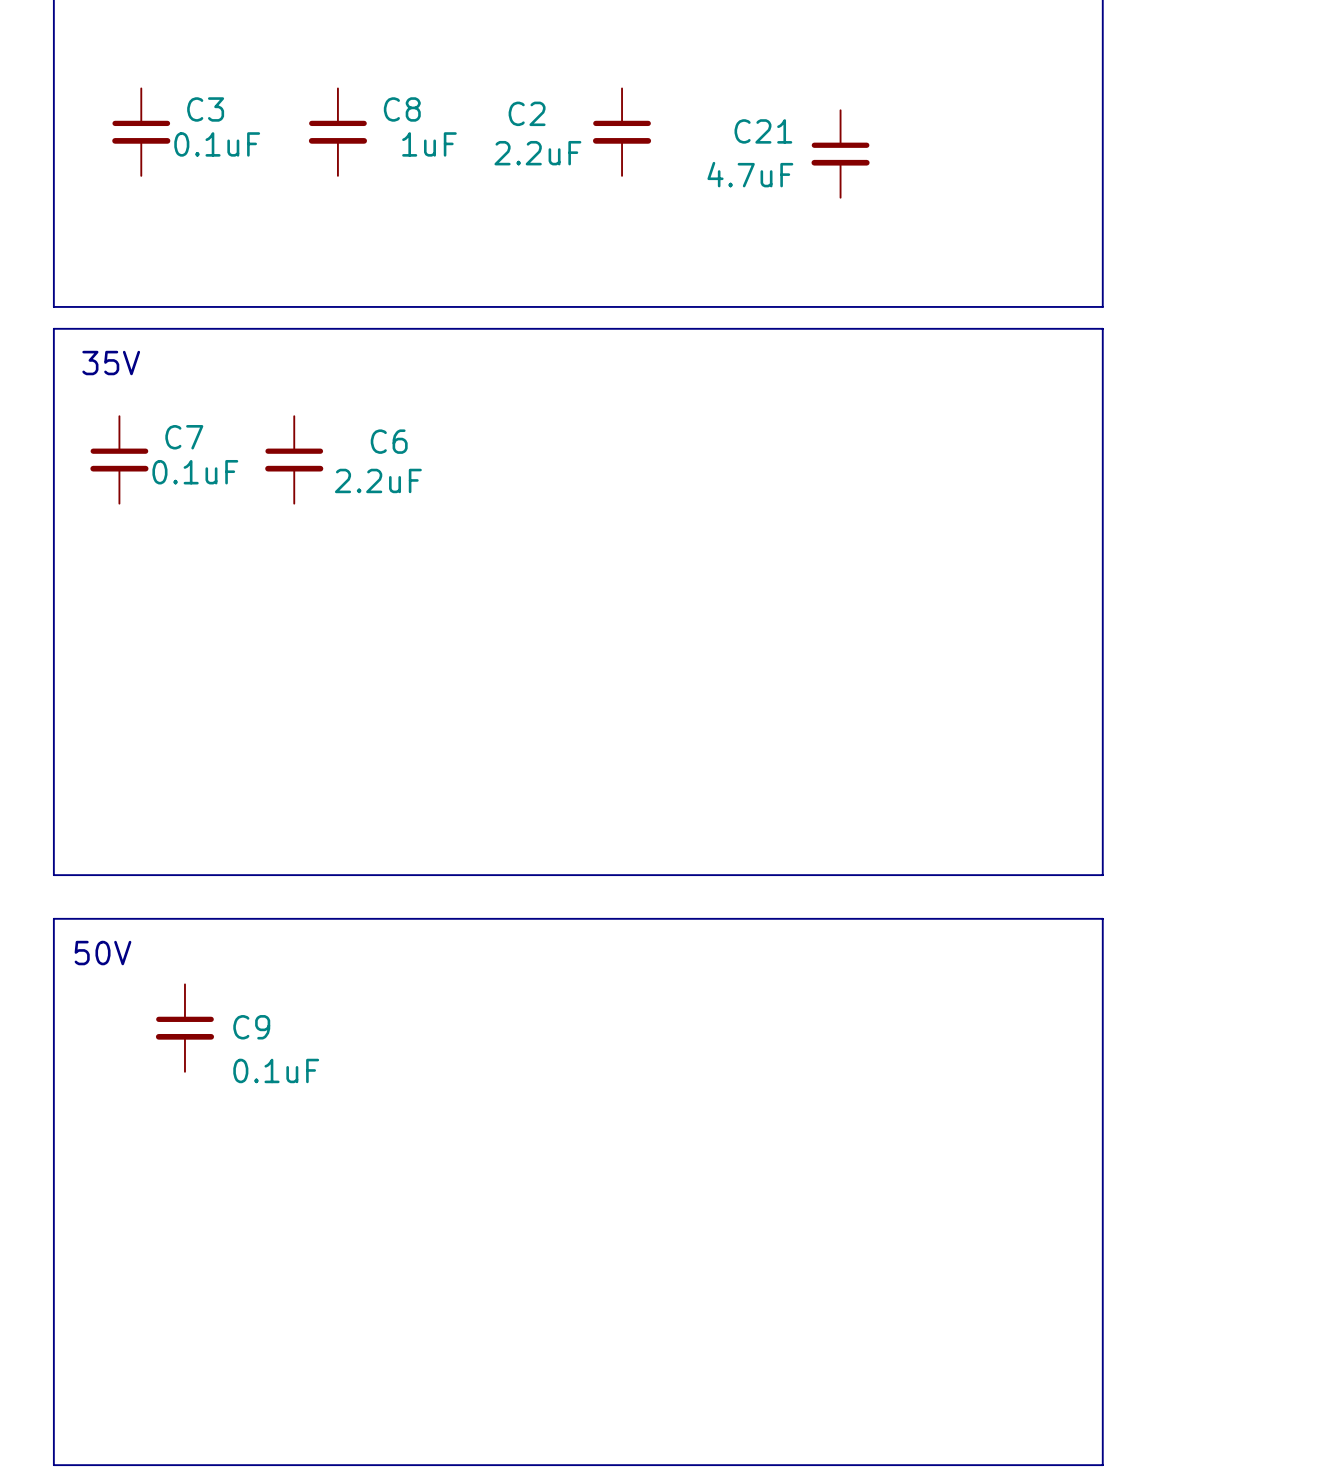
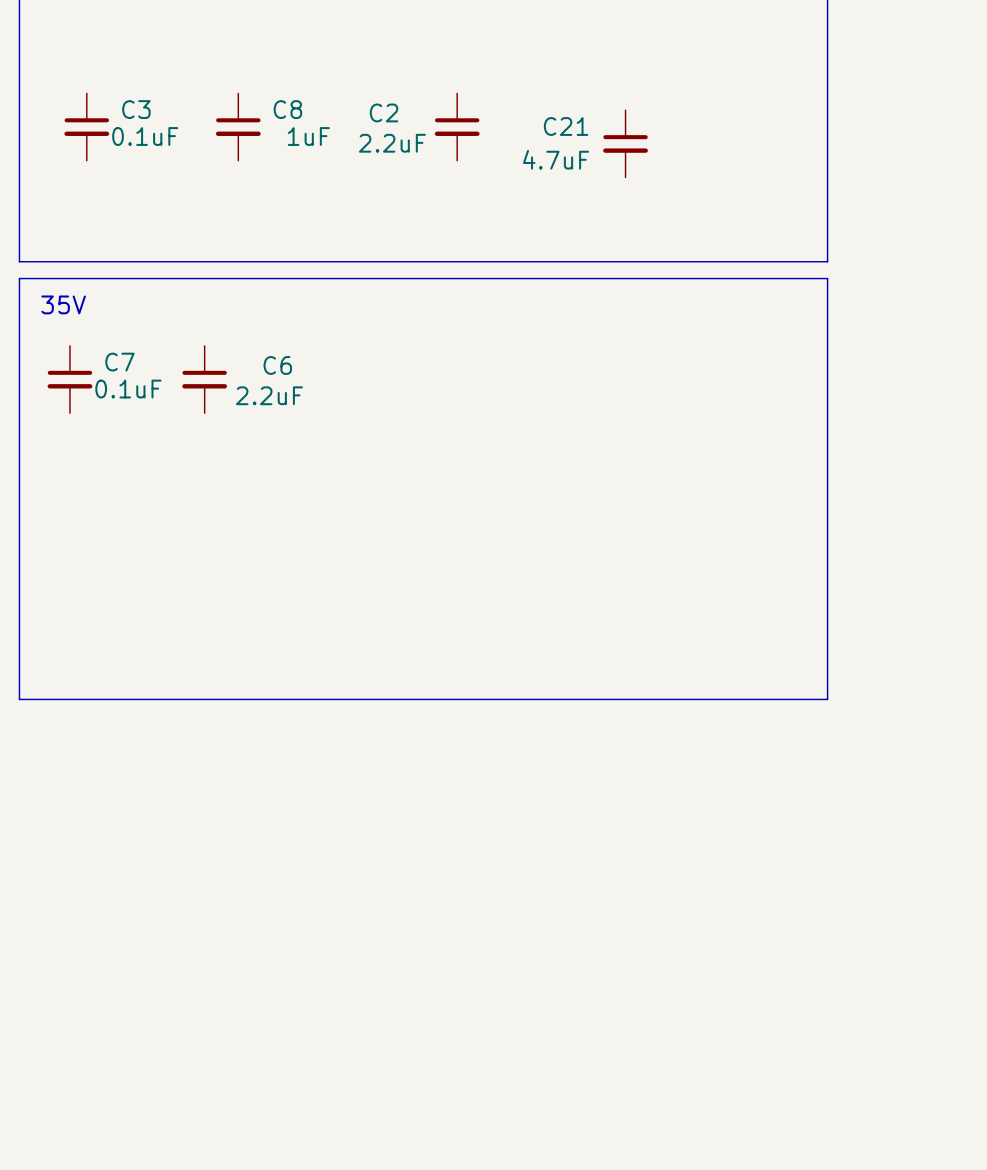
line: (53, 918) (1102, 918) (1102, 1465) (53, 1465) (53, 918) -> none
text: 50V (102, 953) -> none
C9: 0.1uF (184, 1028) -> none

